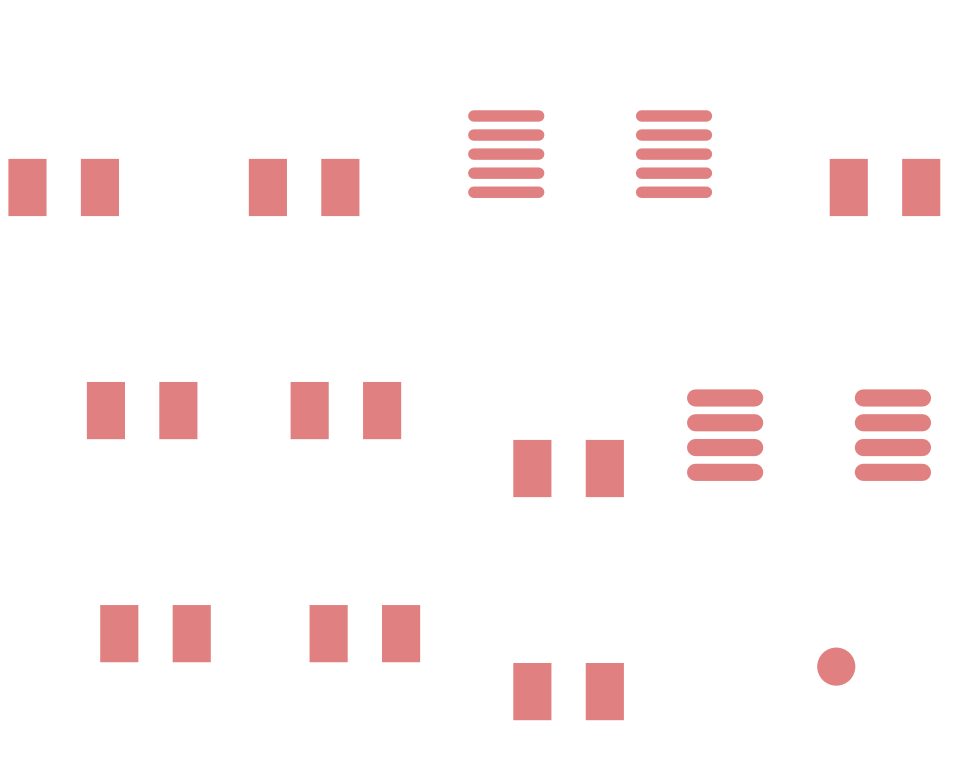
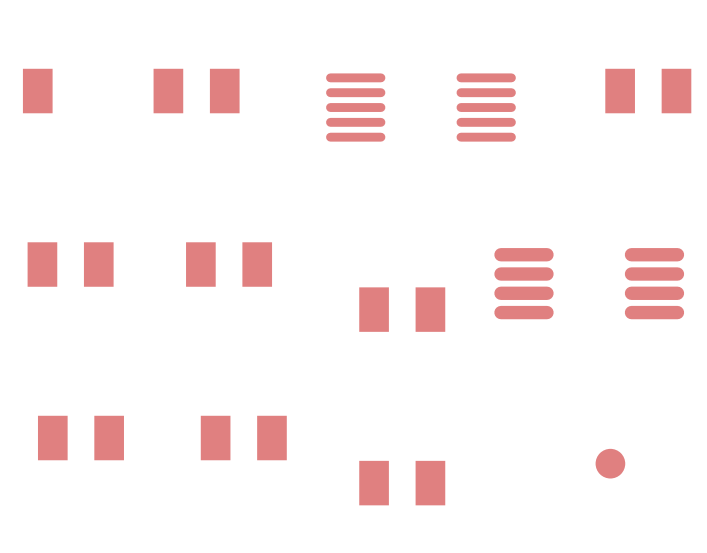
part position: (590, 154) -> (420, 107)

